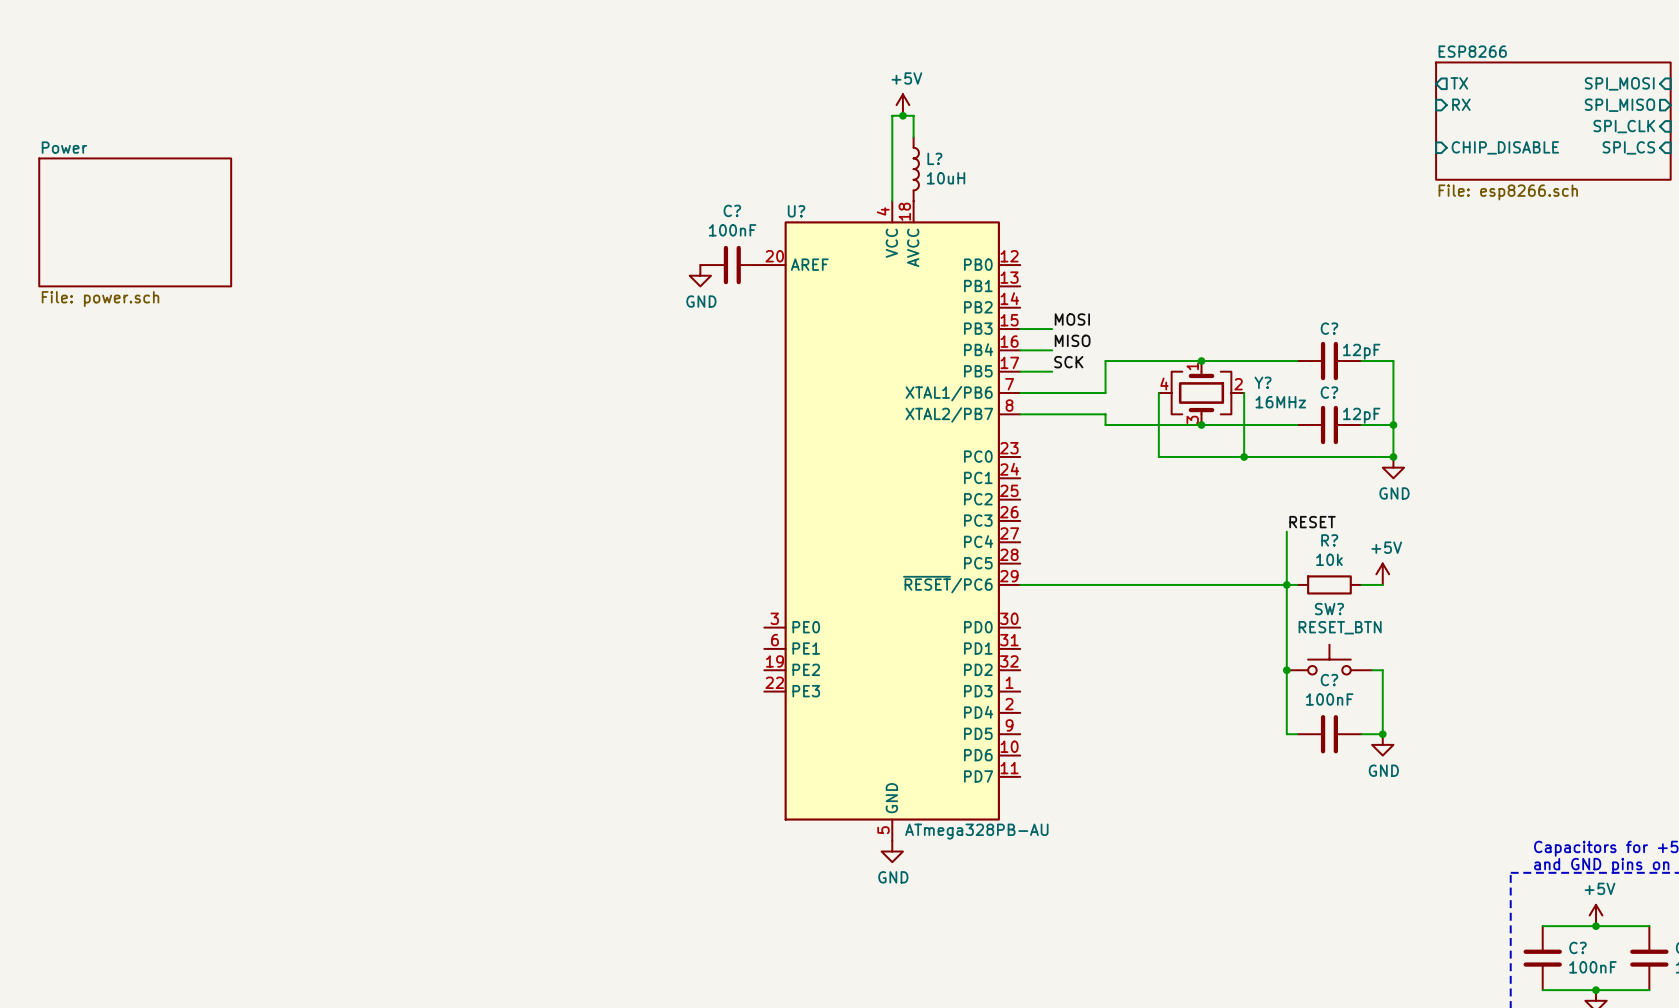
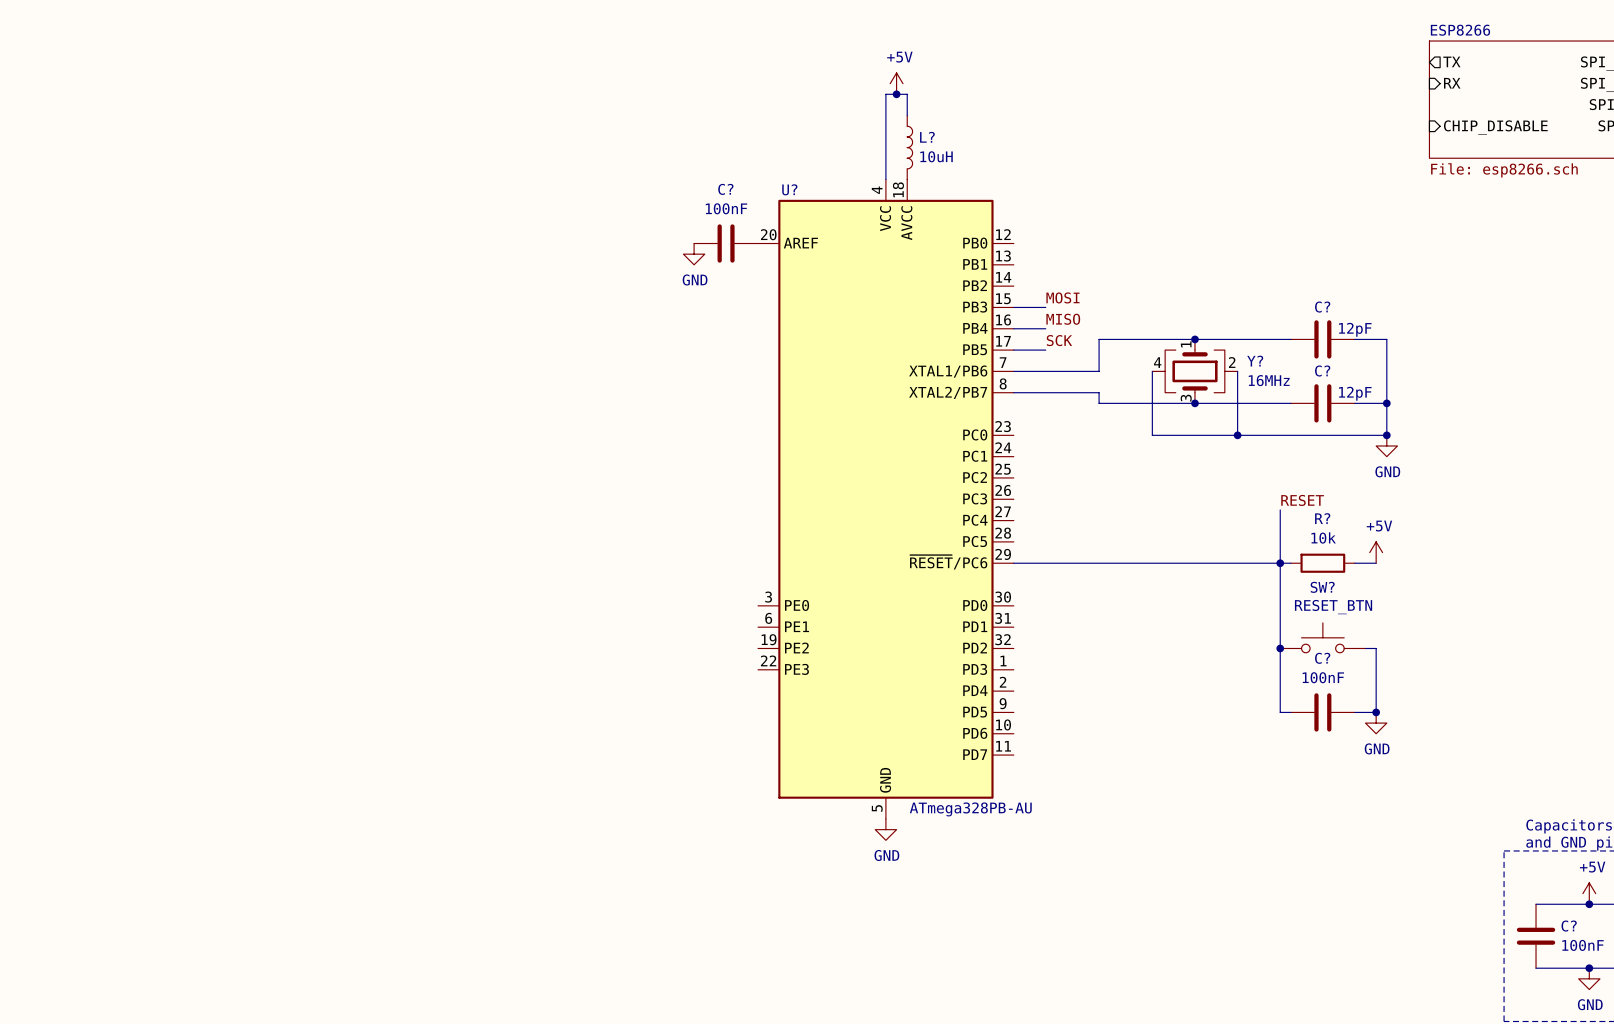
sheet Power: File: power.sch (135, 222) -> none

